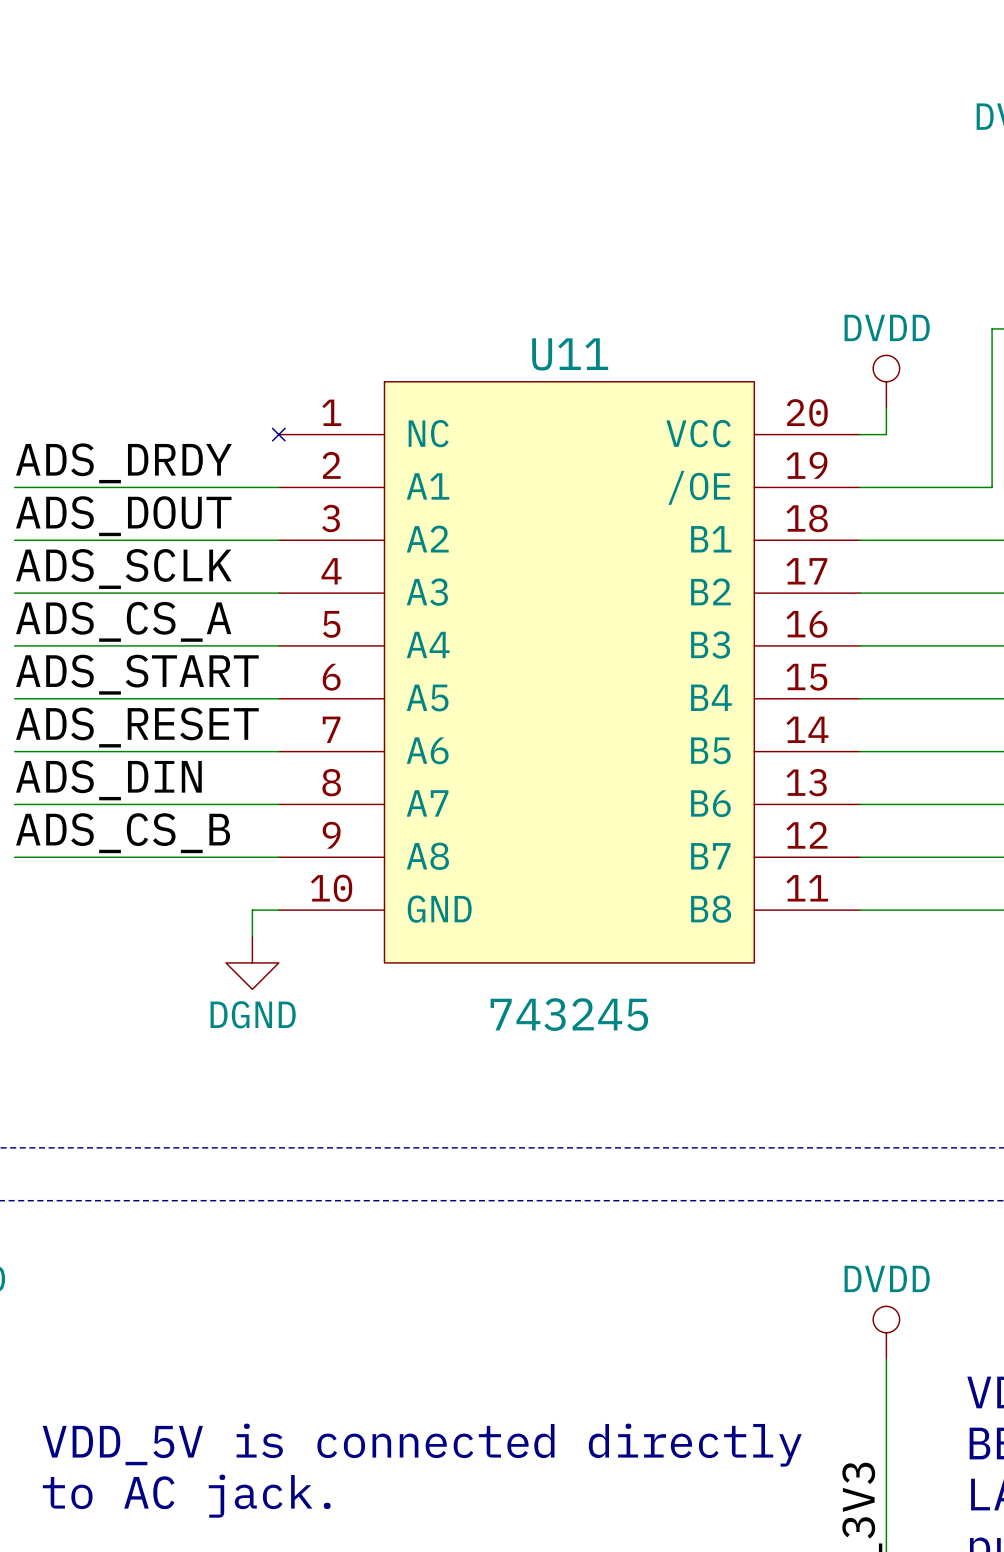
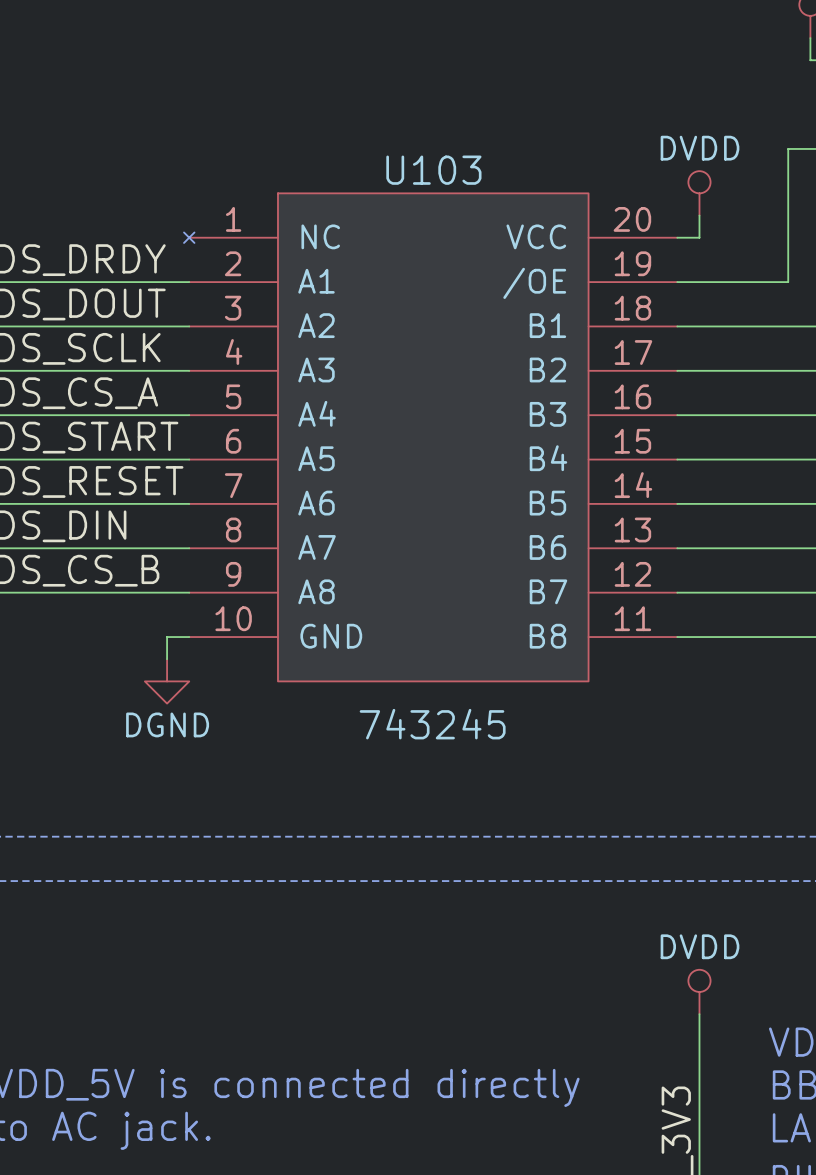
U11 name: U11 (570, 354) -> U103 (433, 170)

